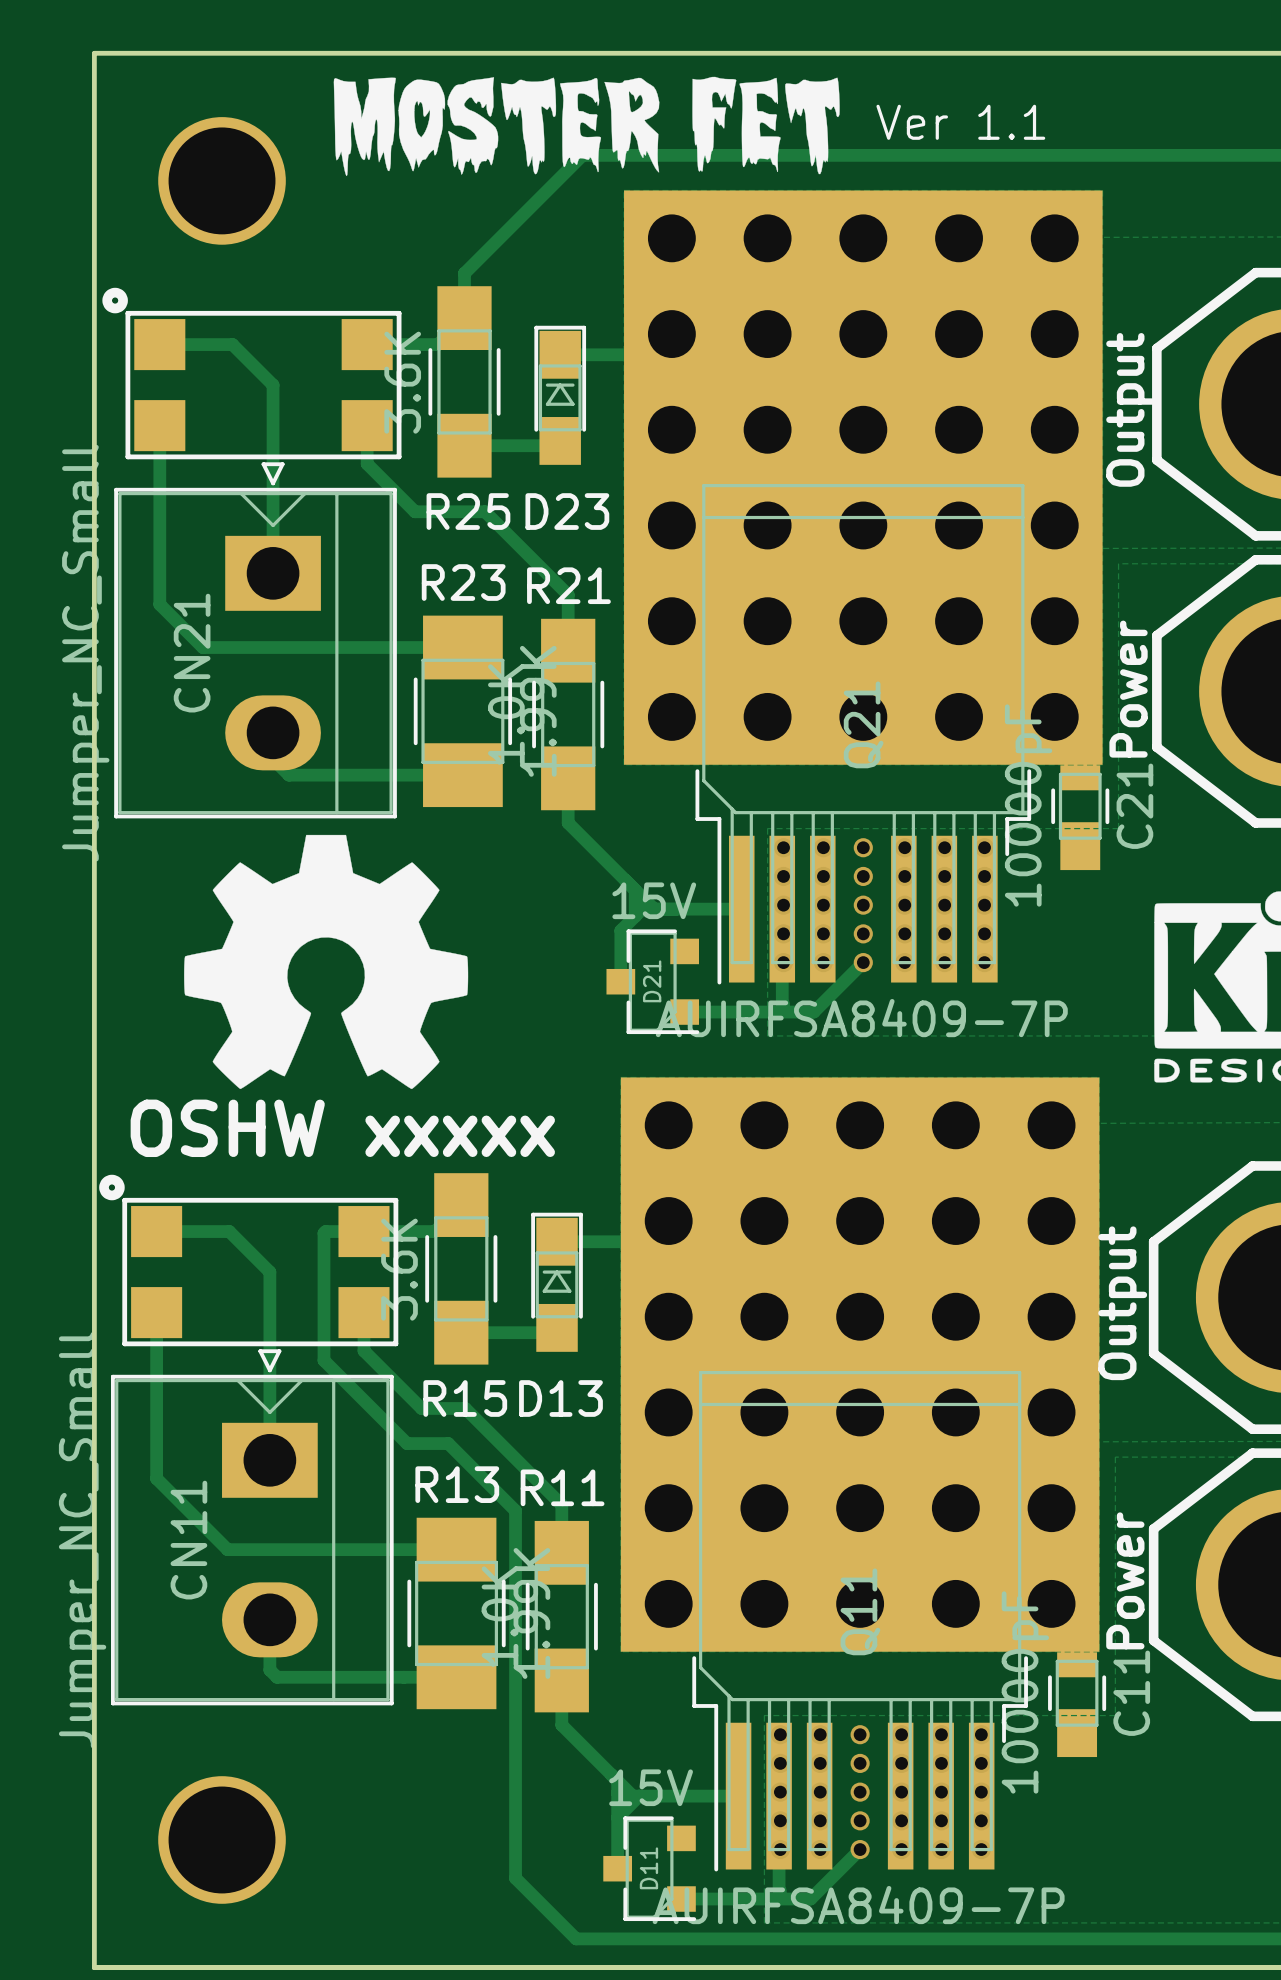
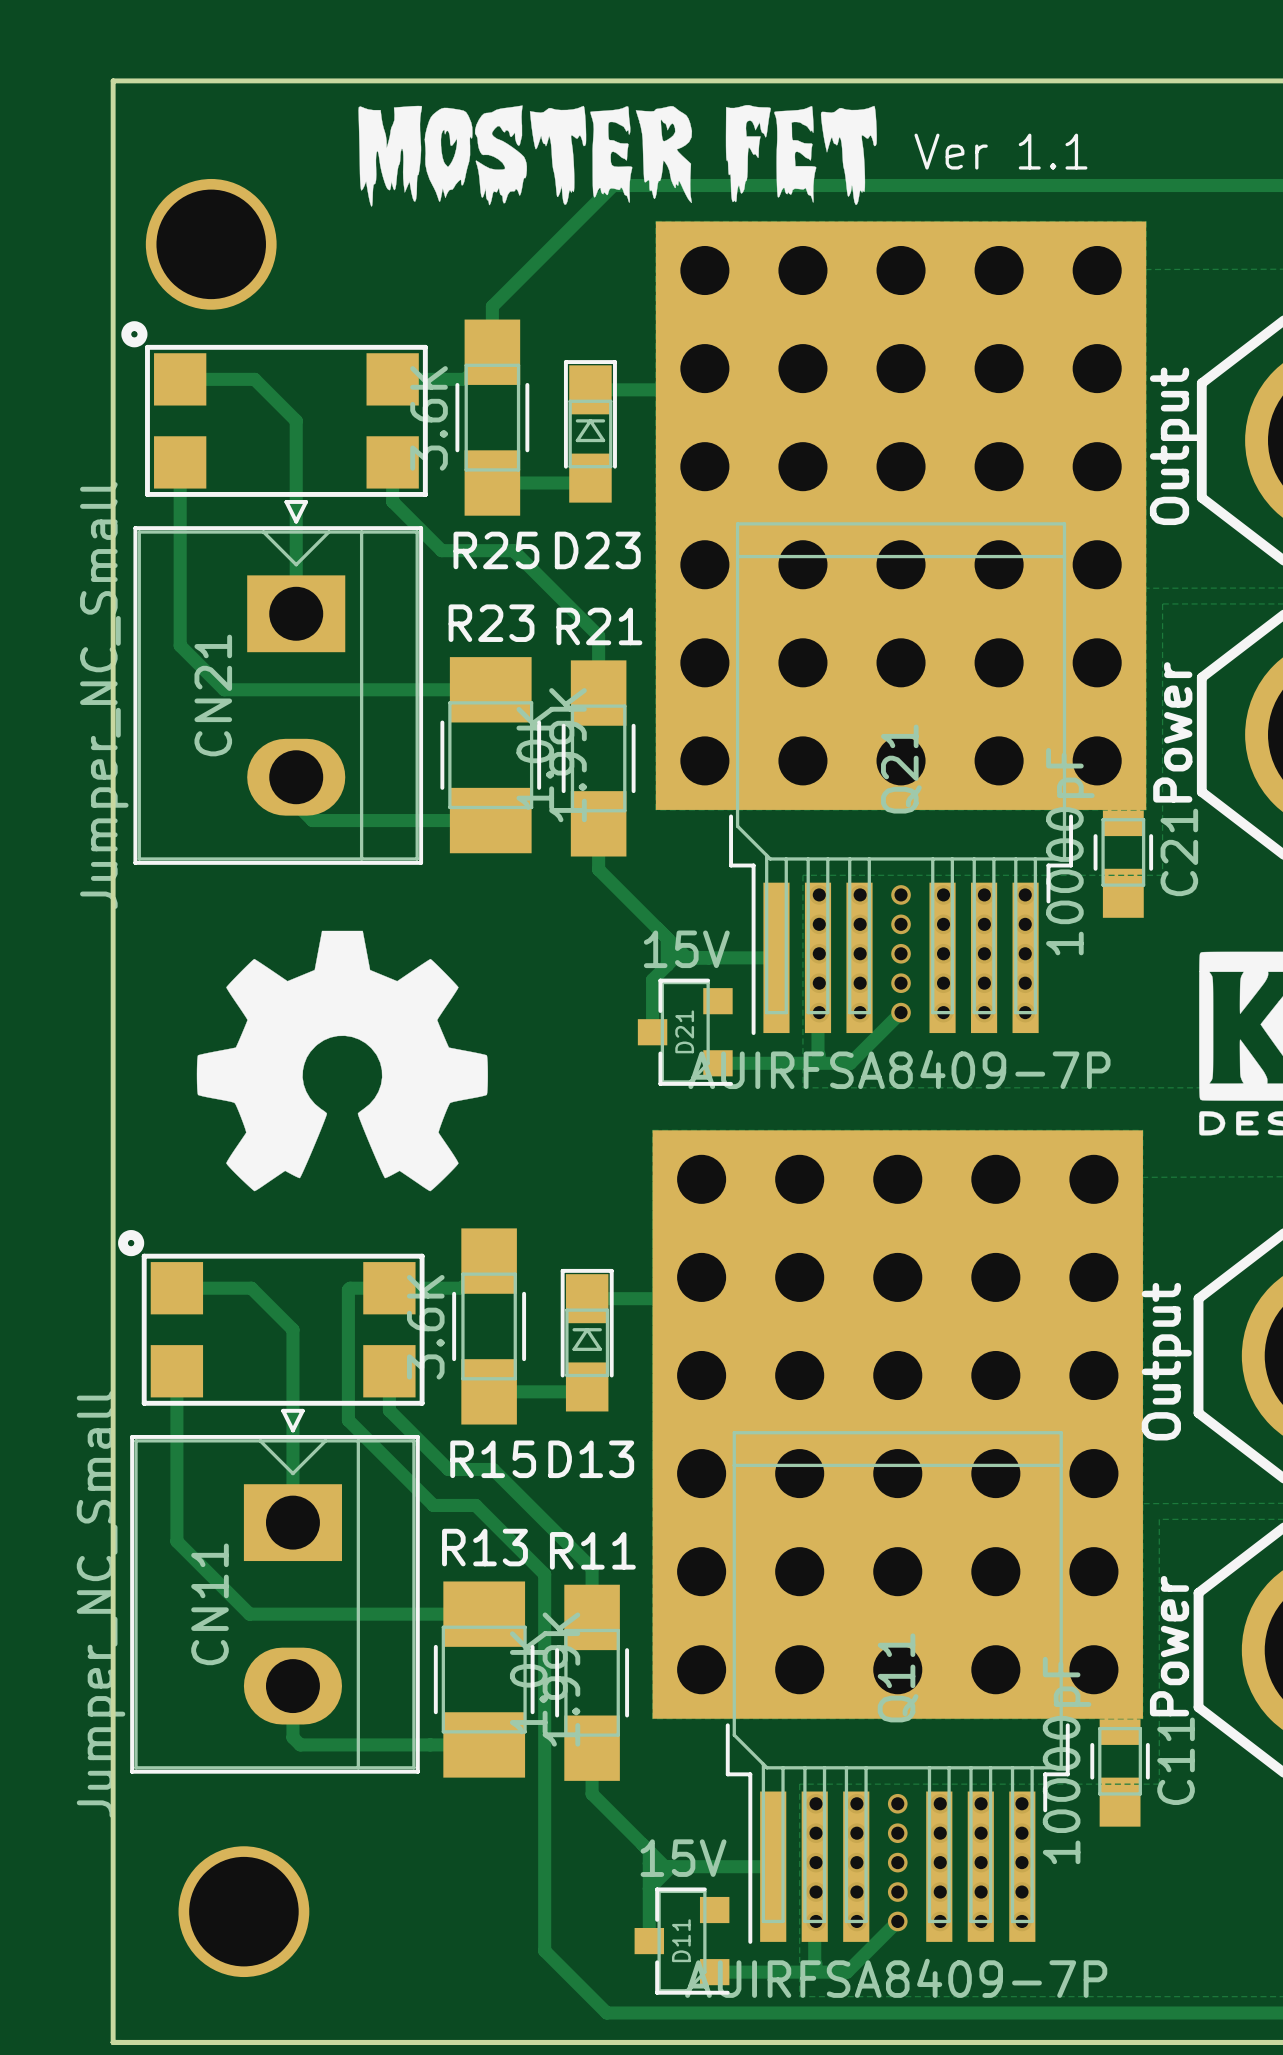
part position: (222, 180) -> (211, 244)
drawing position: (326, 961) -> (342, 1061)
text: OSHW xxxxx (342, 1128) -> none

